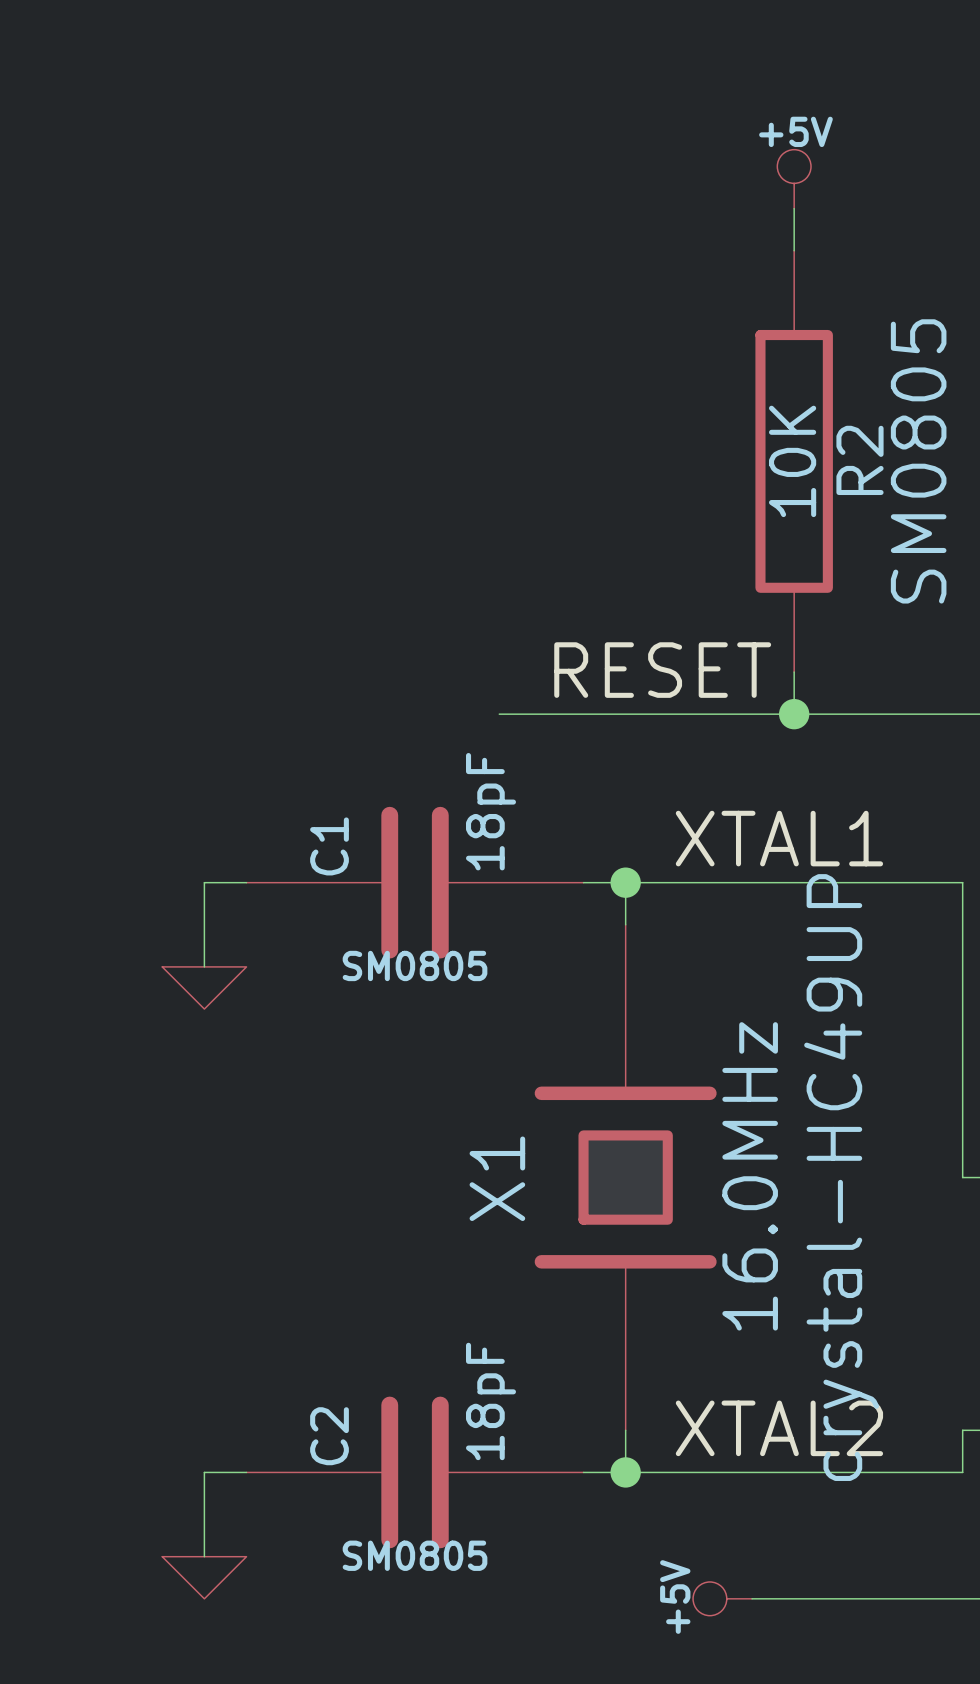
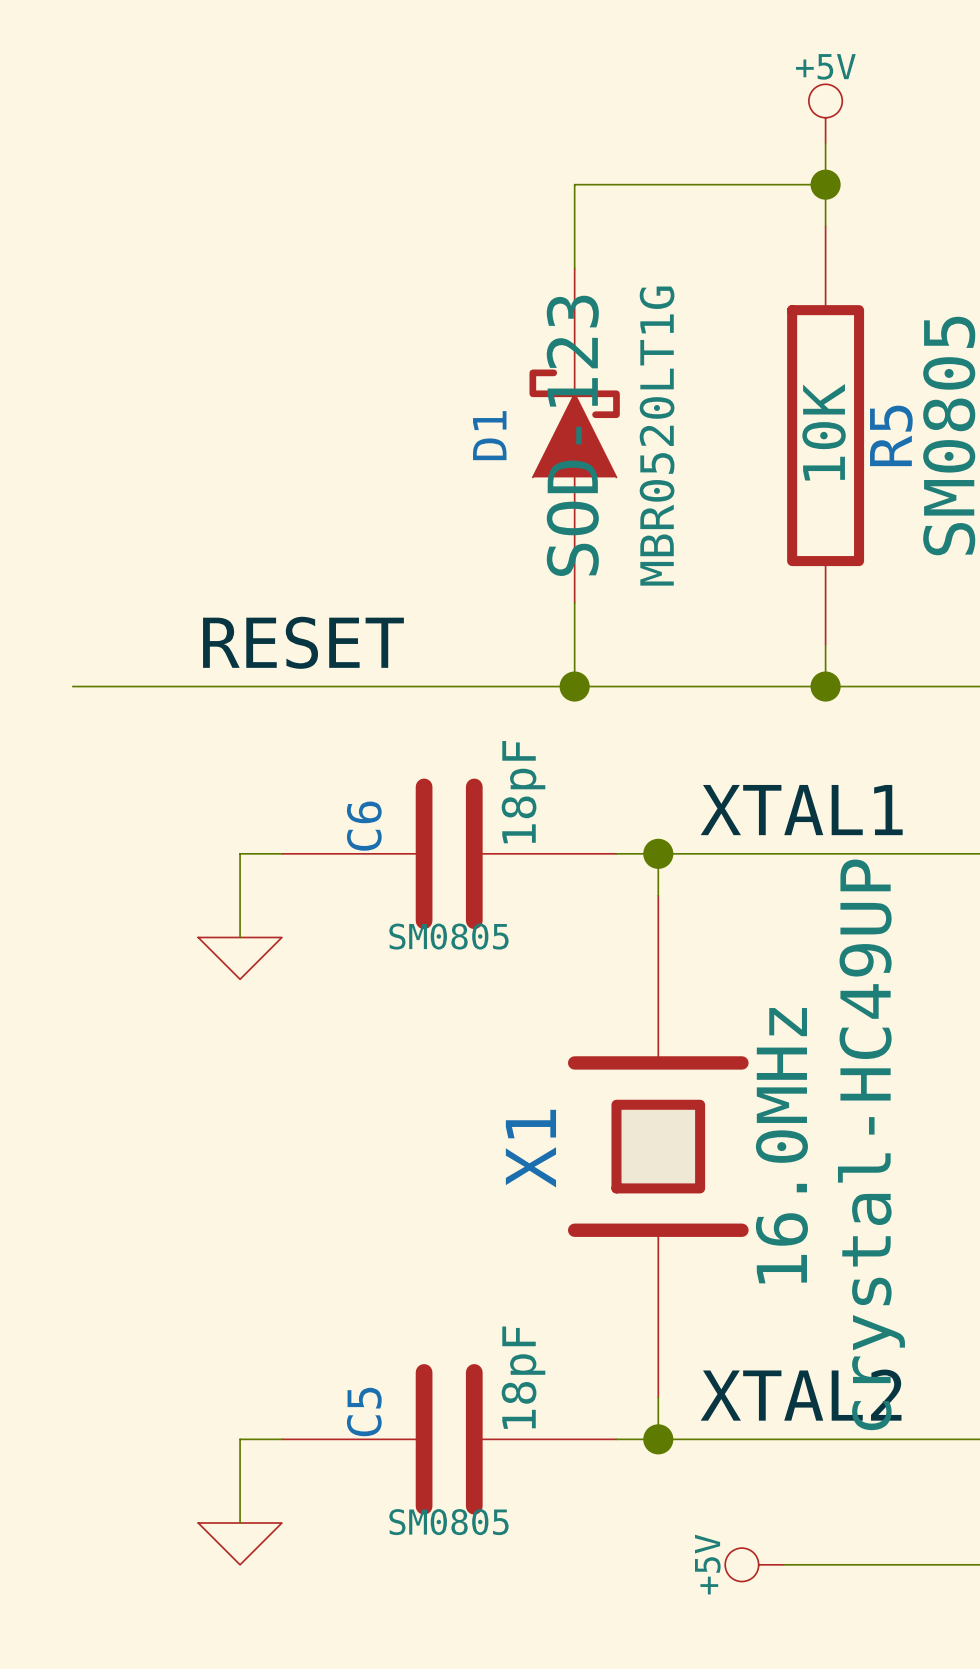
wire: none -> (825, 142) (825, 184) (574, 184) (574, 268)
power symbol position: +5V (794, 179) -> +5V (825, 113)
junction: none -> (825, 184)
R2 name: R2 (859, 460) -> R5 (891, 435)
D1: none -> MBR0520LT1G (574, 435)
wire: none -> (574, 602) (574, 686)
label position: RESET (662, 670) -> RESET (303, 642)
wire: none -> (72, 686) (532, 686)
junction: none -> (574, 686)
C1 name: C1 (329, 846) -> C6 (364, 826)
C2 name: C2 (329, 1436) -> C5 (364, 1412)

